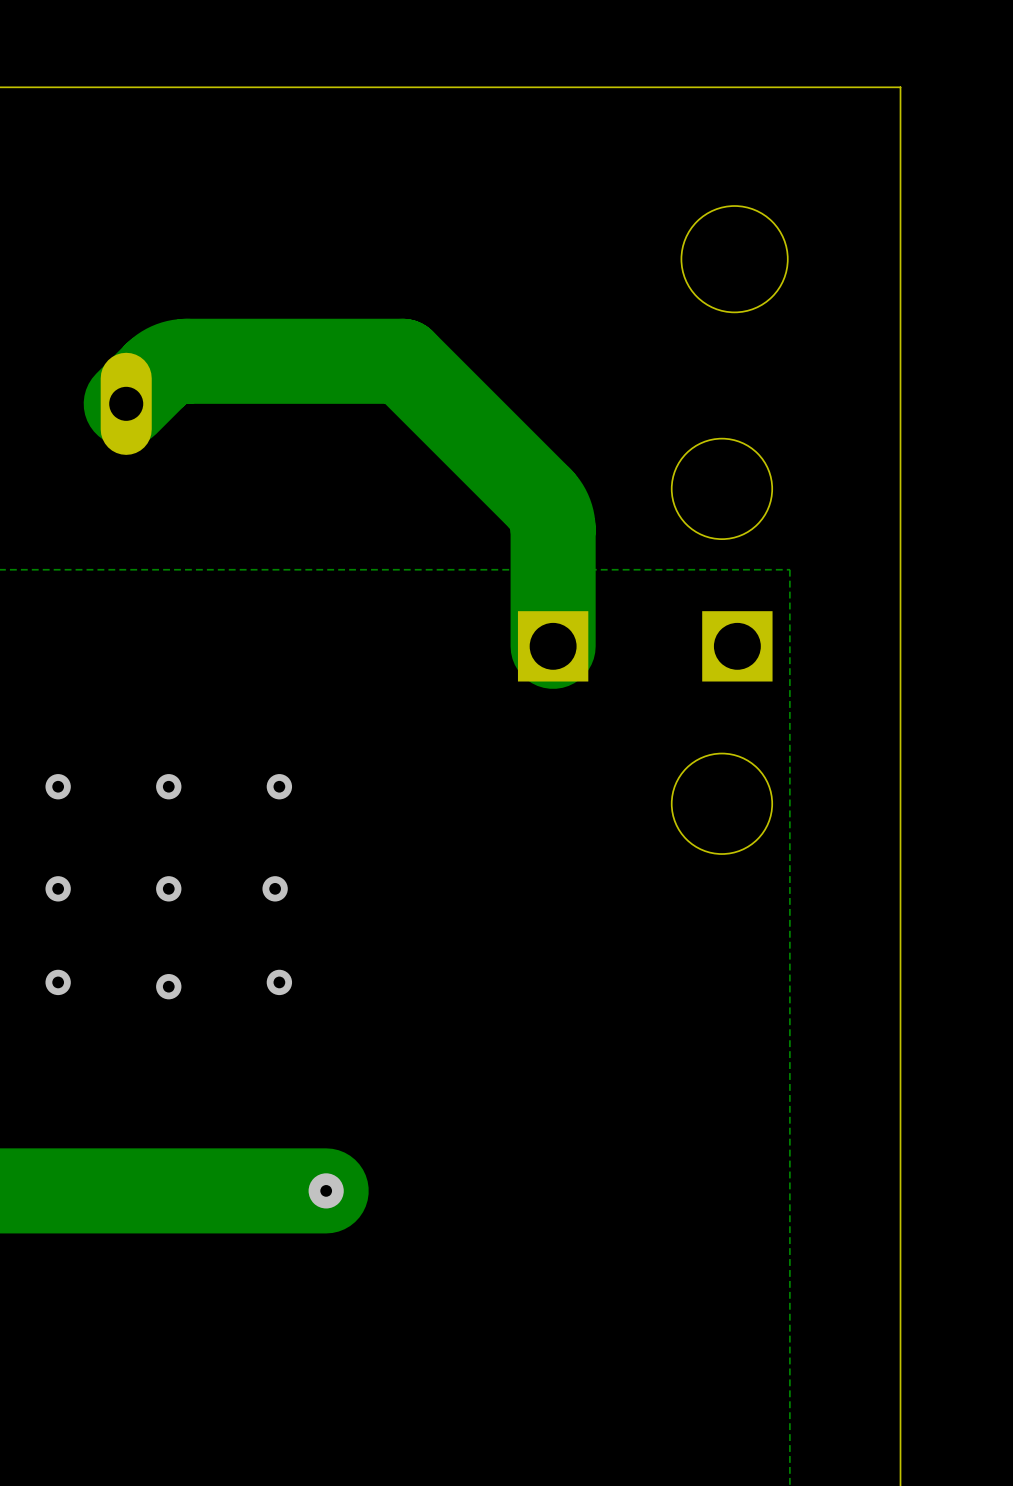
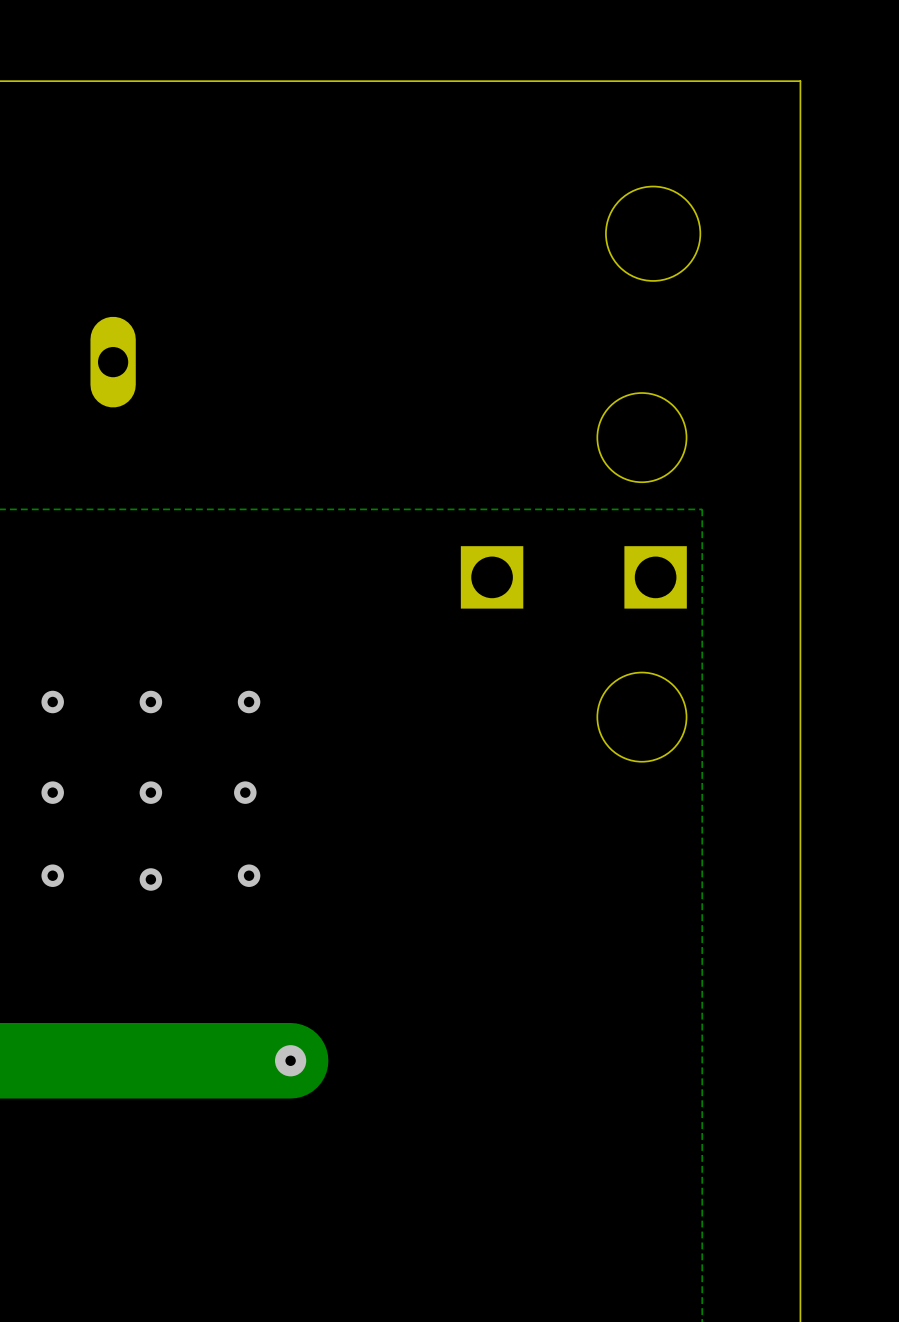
track: (126, 403) (160, 370) (180, 361) (402, 361) (547, 508) (553, 529) (553, 646) -> none

